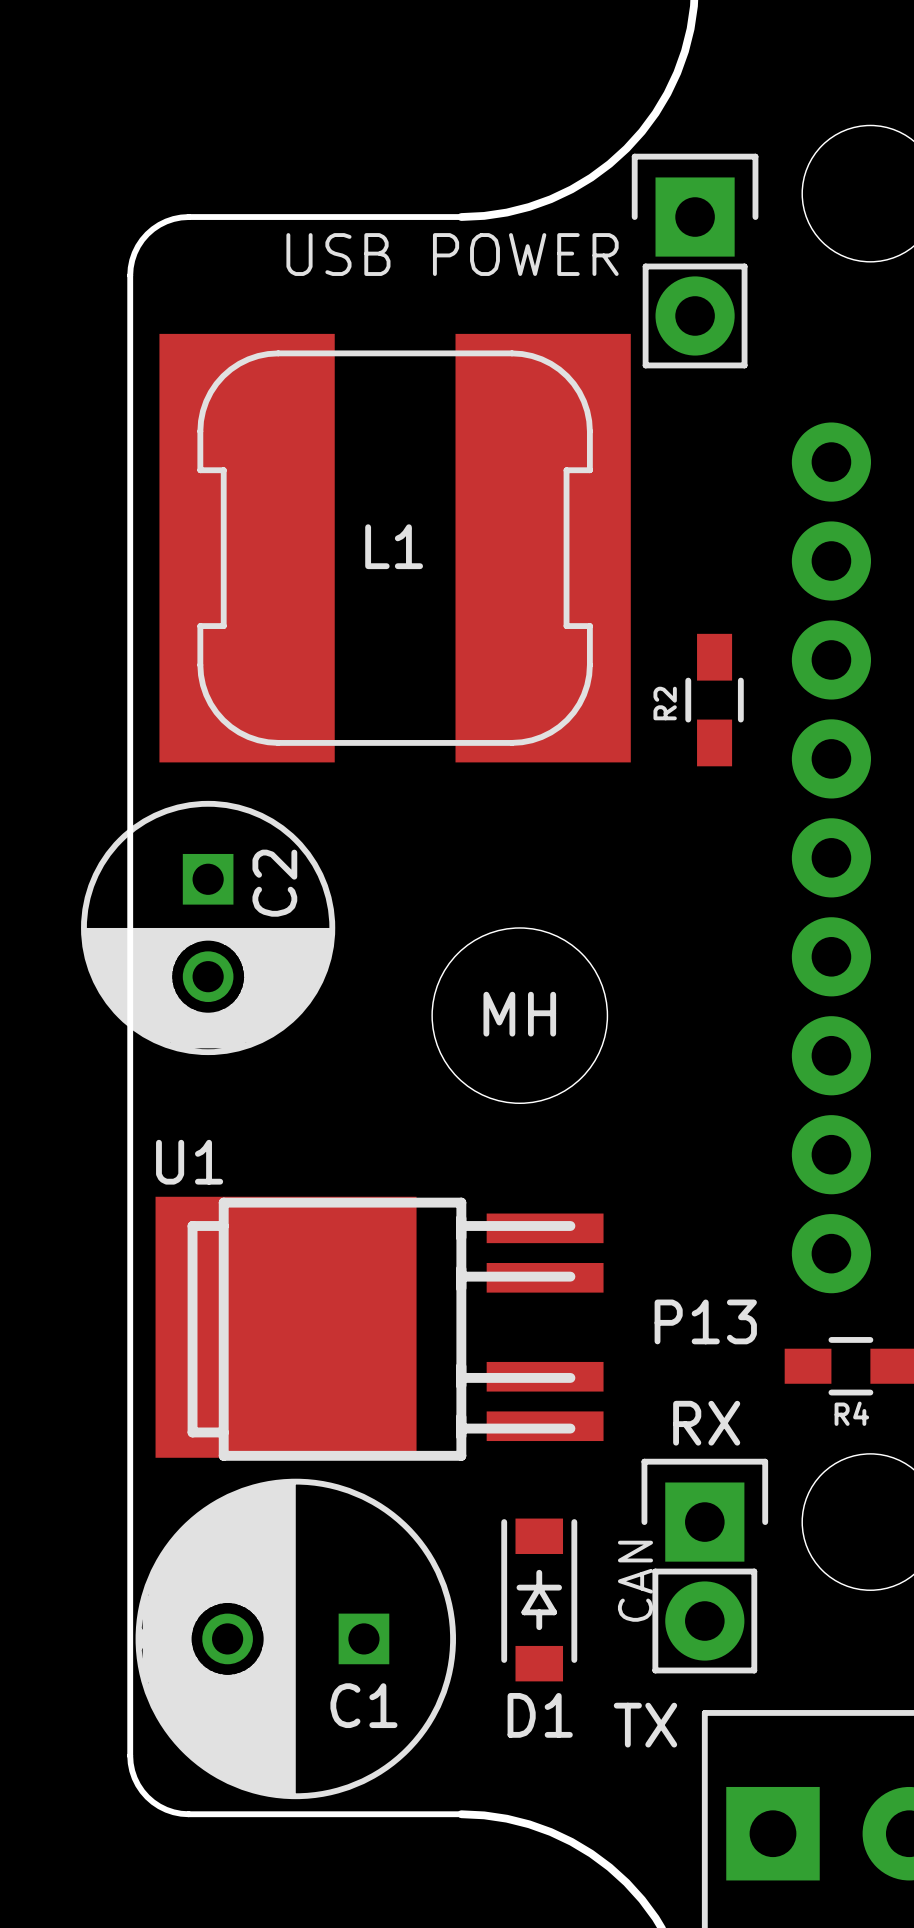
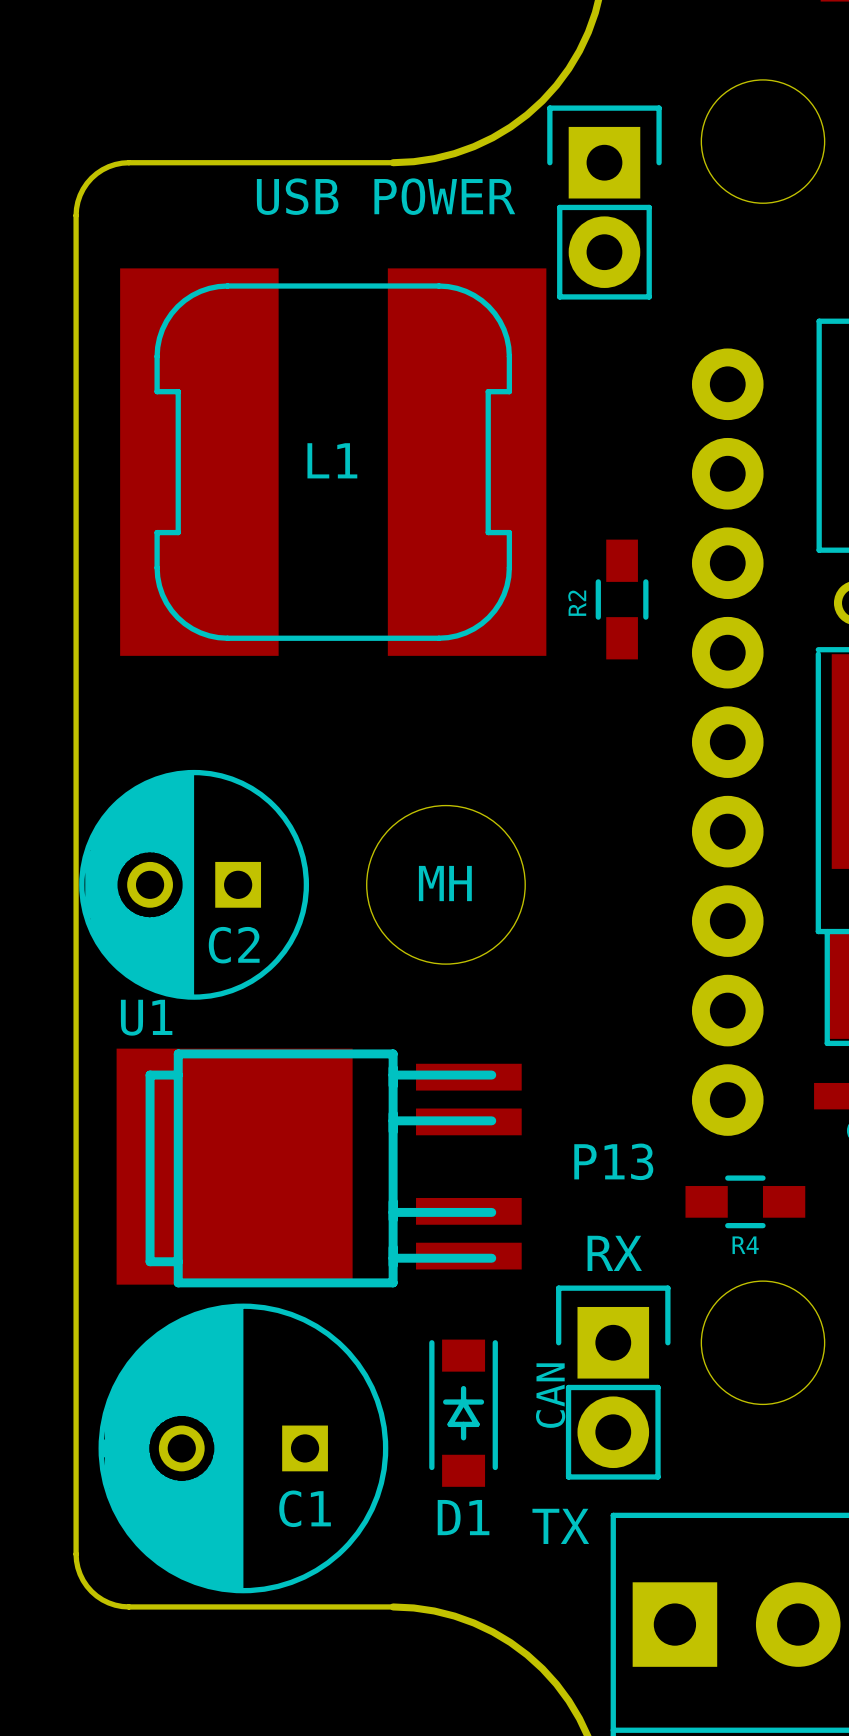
board edge: (188, 217) (166, 221) (147, 234) (134, 253) (130, 275) (130, 1755) (134, 1778) (147, 1797) (166, 1809) (188, 1814) -> (146, 162) (115, 164) (96, 173) (87, 183) (80, 195) (76, 215) (76, 1554) (80, 1574) (87, 1586) (96, 1596) (115, 1605) (146, 1606)
C2 rotation: 0° (208, 927) -> 90° clockwise (194, 884)

